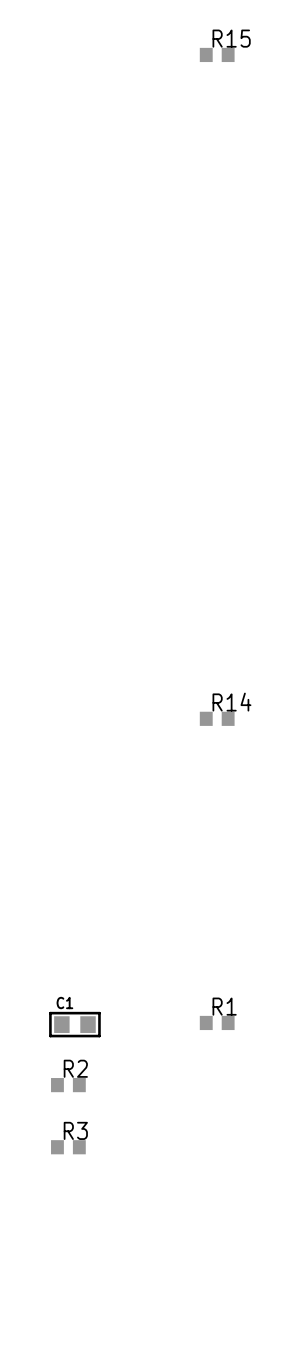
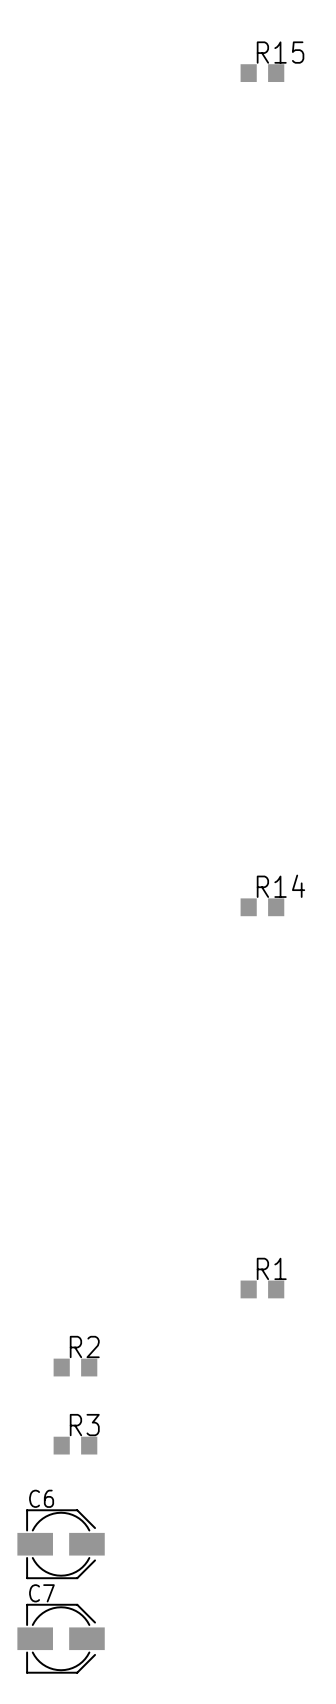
C1: (74, 1024) -> none
C6: none -> (61, 1544)
C7: none -> (61, 1638)

